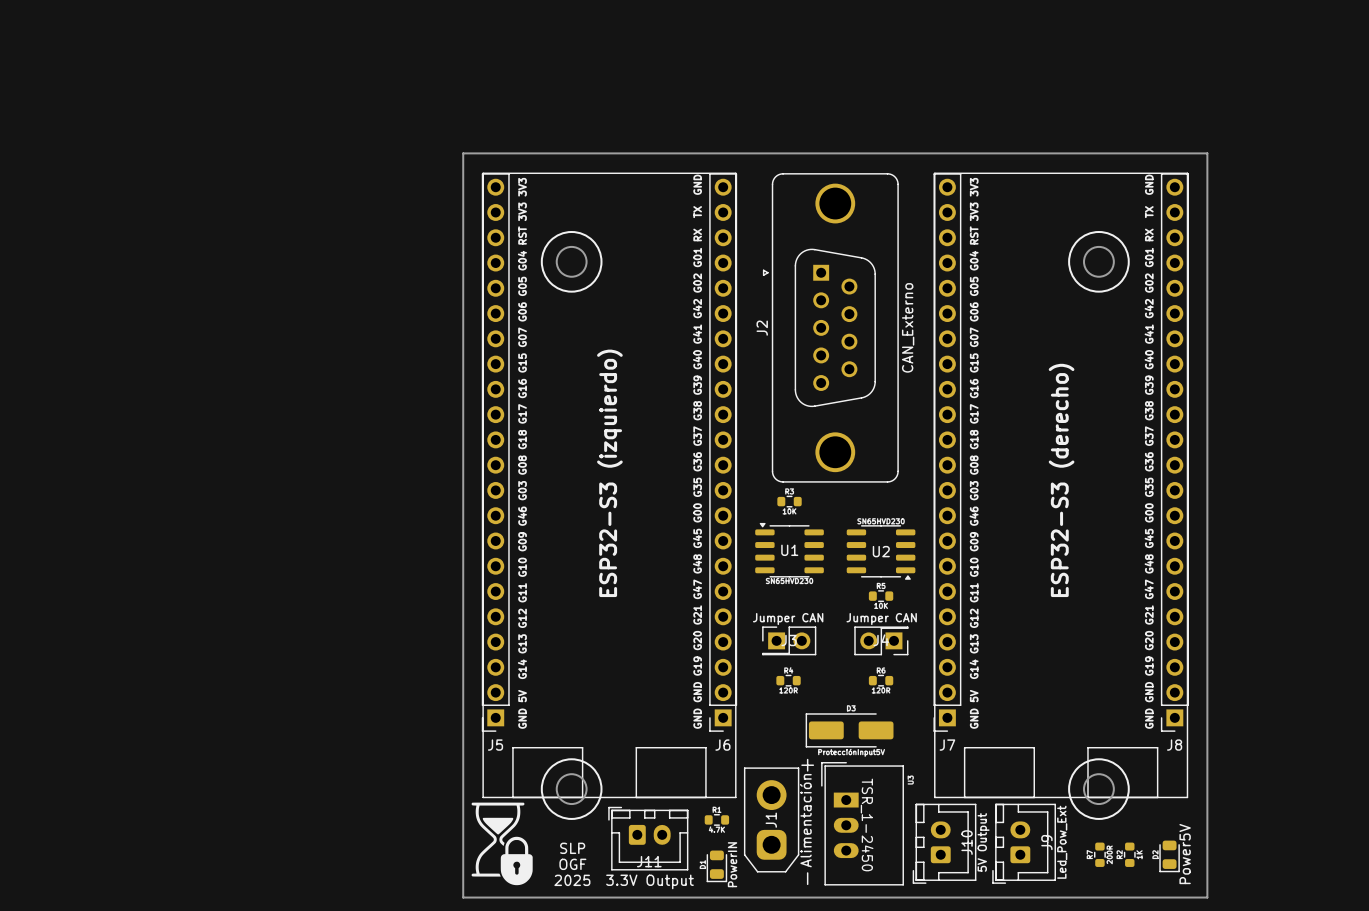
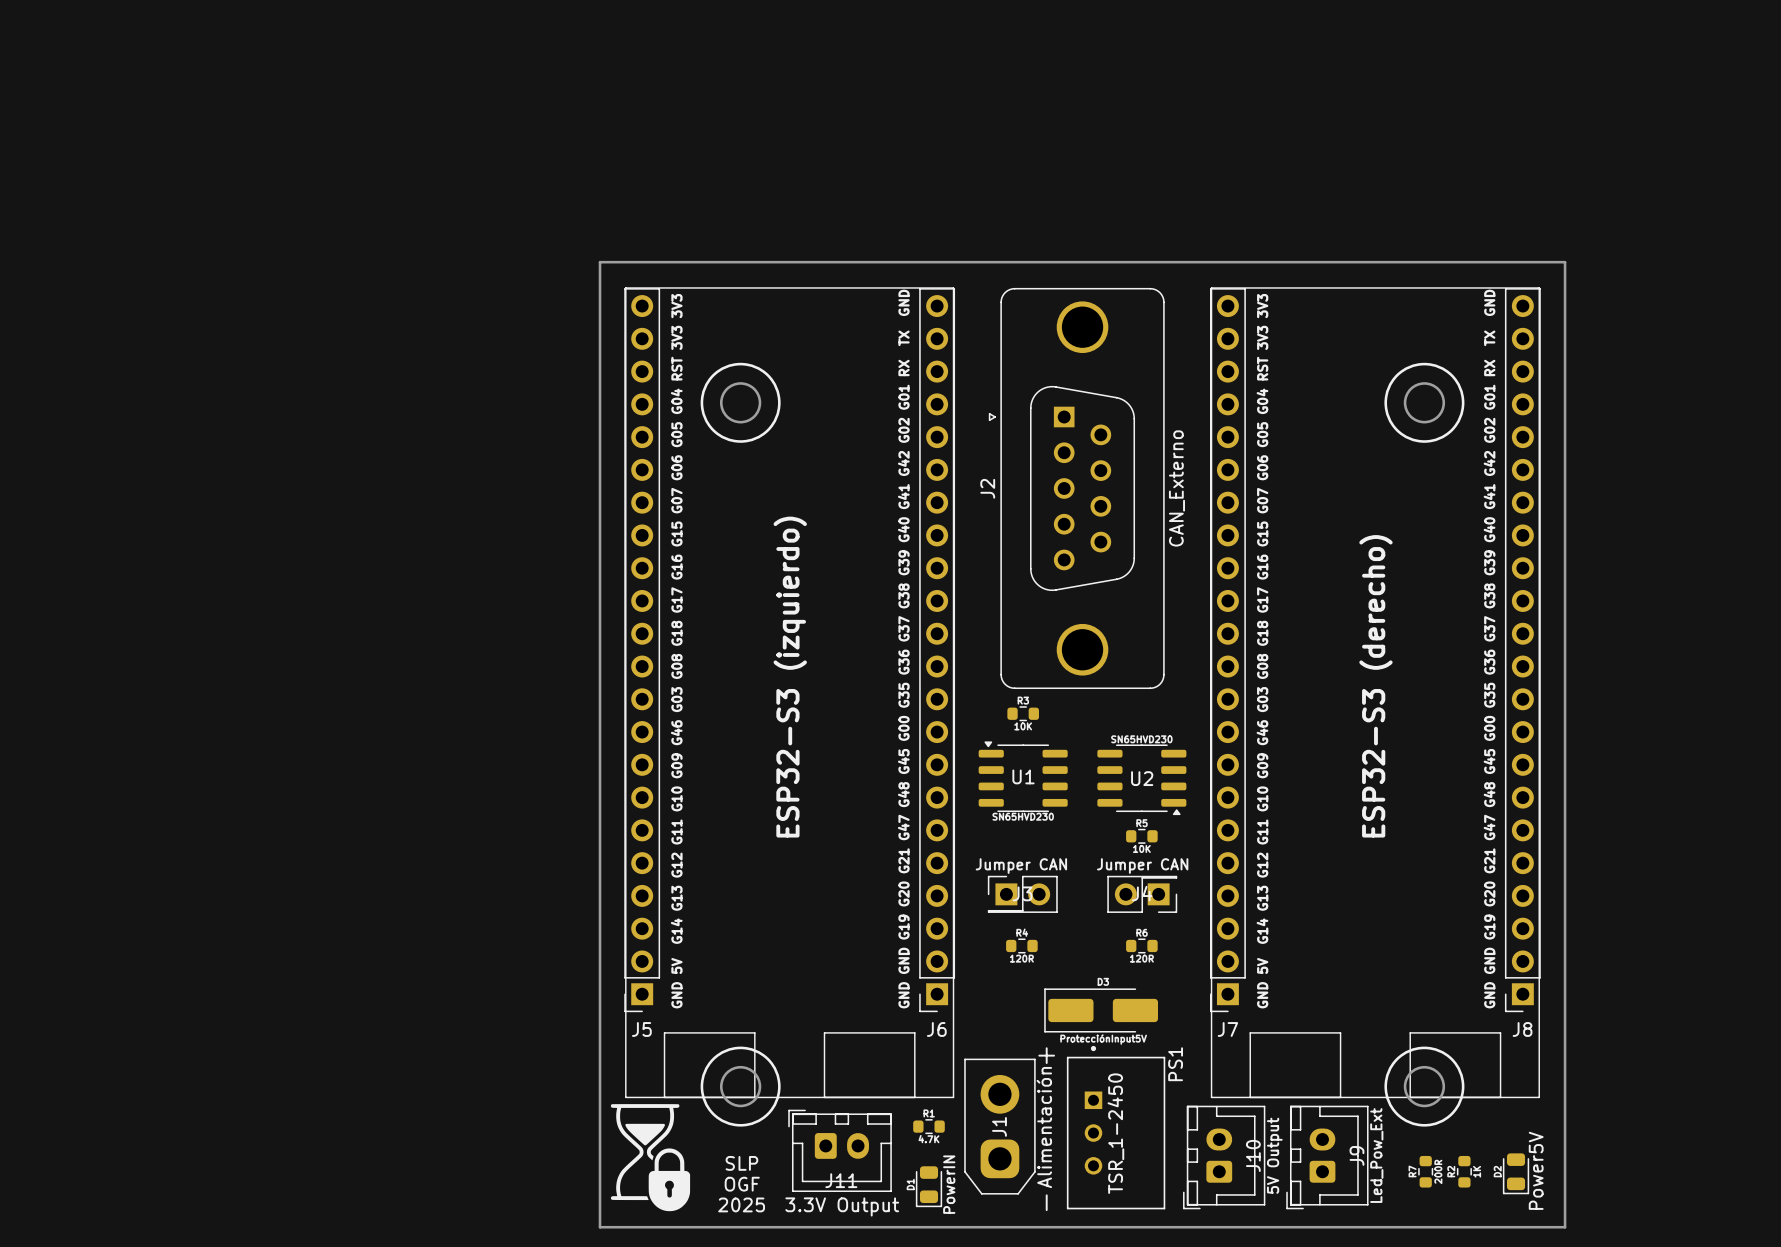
PS1: none -> TSR_1-2450 (1116, 1127)
part: (862, 823) -> none
text: TSR_1-2450 (867, 824) -> none

